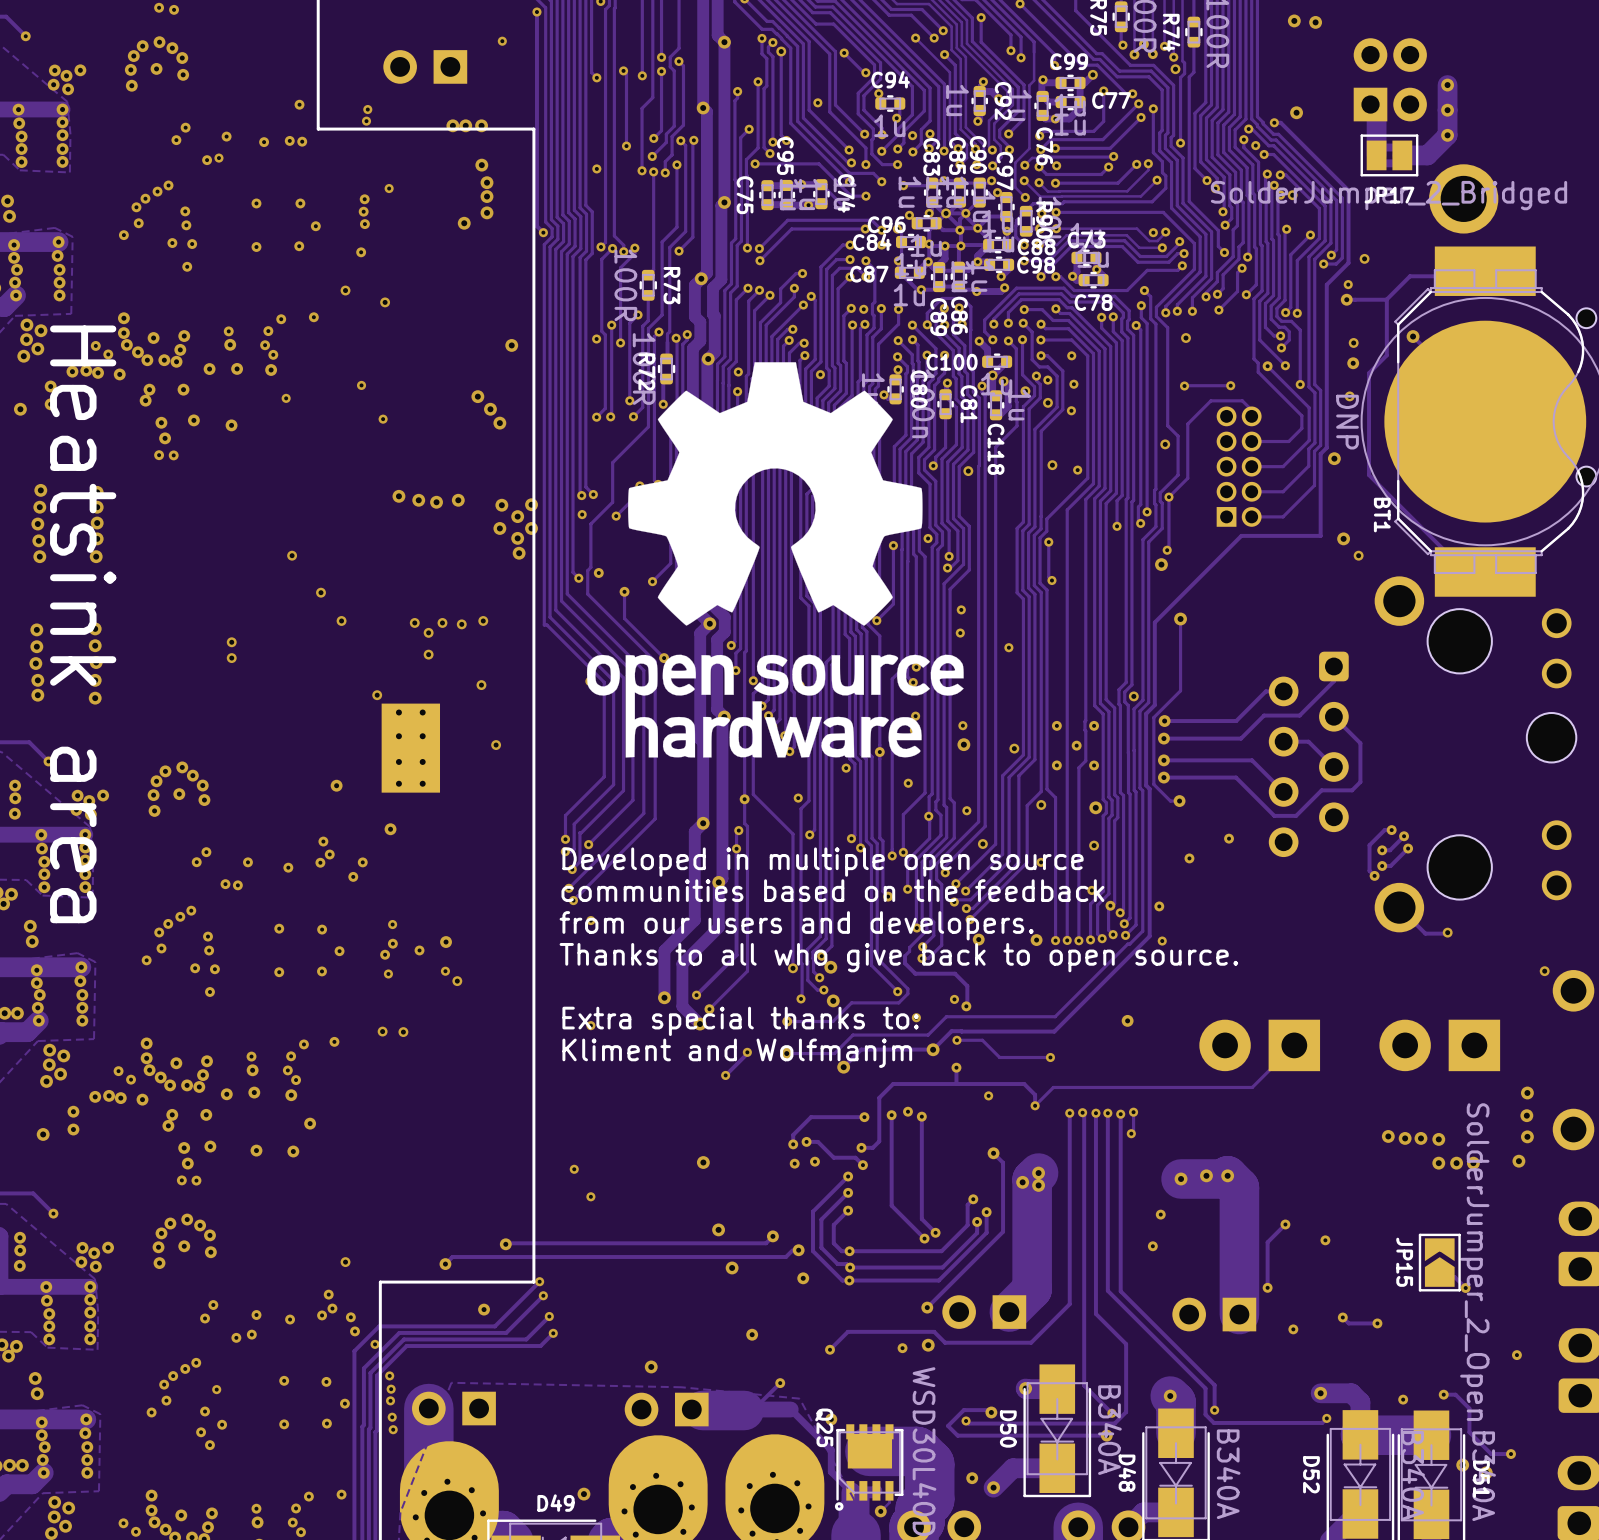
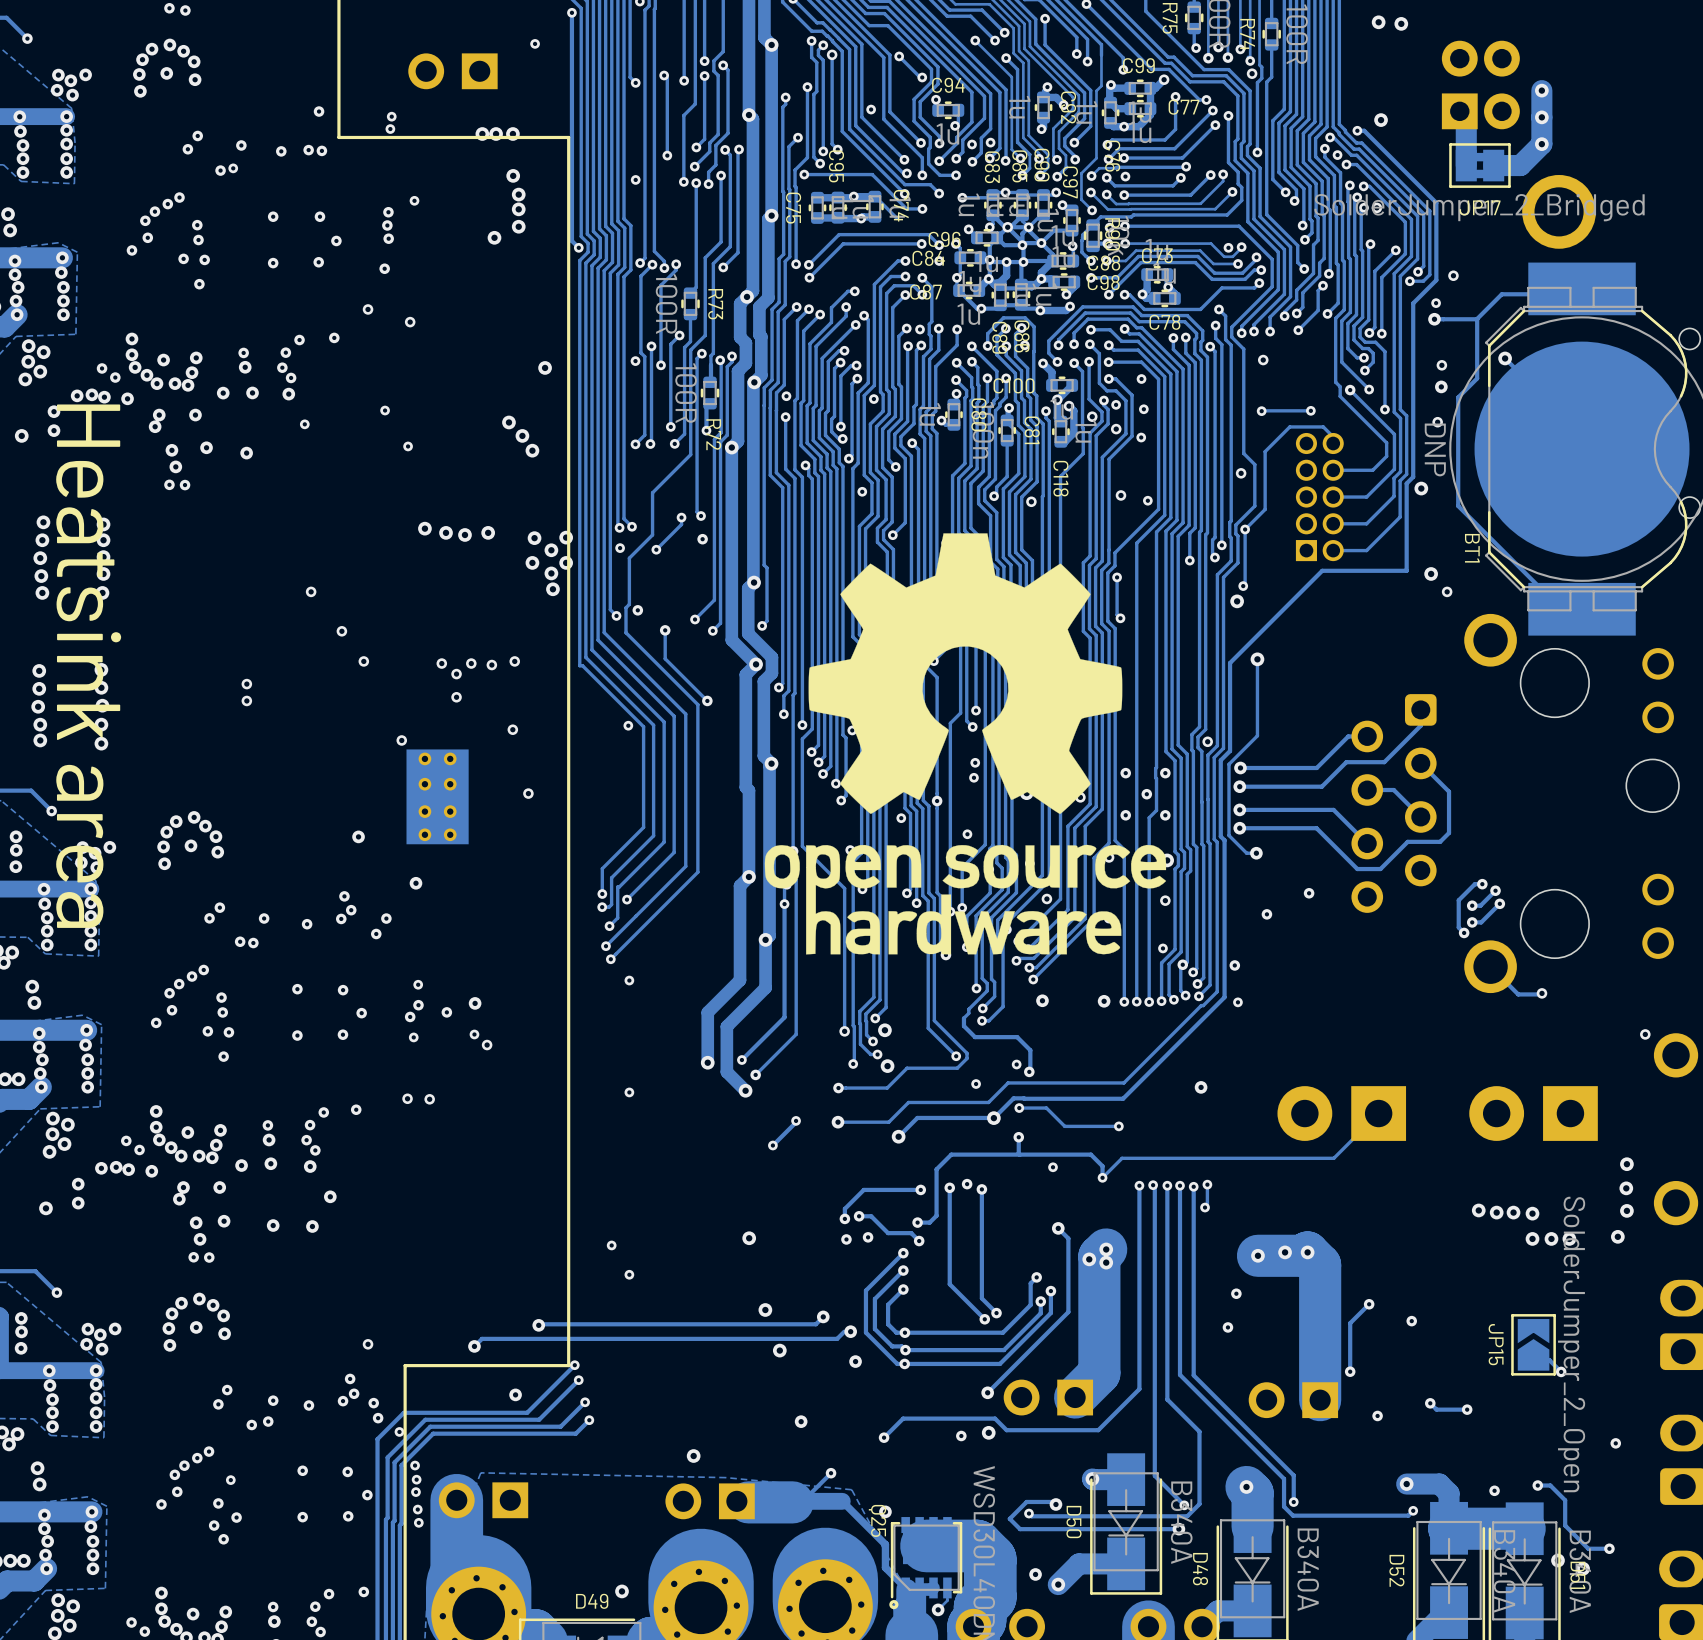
R72 name position: R72 (646, 371) -> R72 (713, 434)
drawing position: (775, 559) -> (965, 743)
text: Developed in multiple open source (823, 862) -> none
text: communities based on the feedback (832, 890) -> none
text: from our users and developers. (796, 925) -> none
text: Thanks to all who give back to open source. (898, 957) -> none
text: Extra special thanks to: (740, 1021) -> none
text: Kliment and Wolfmanjm (737, 1053) -> none

